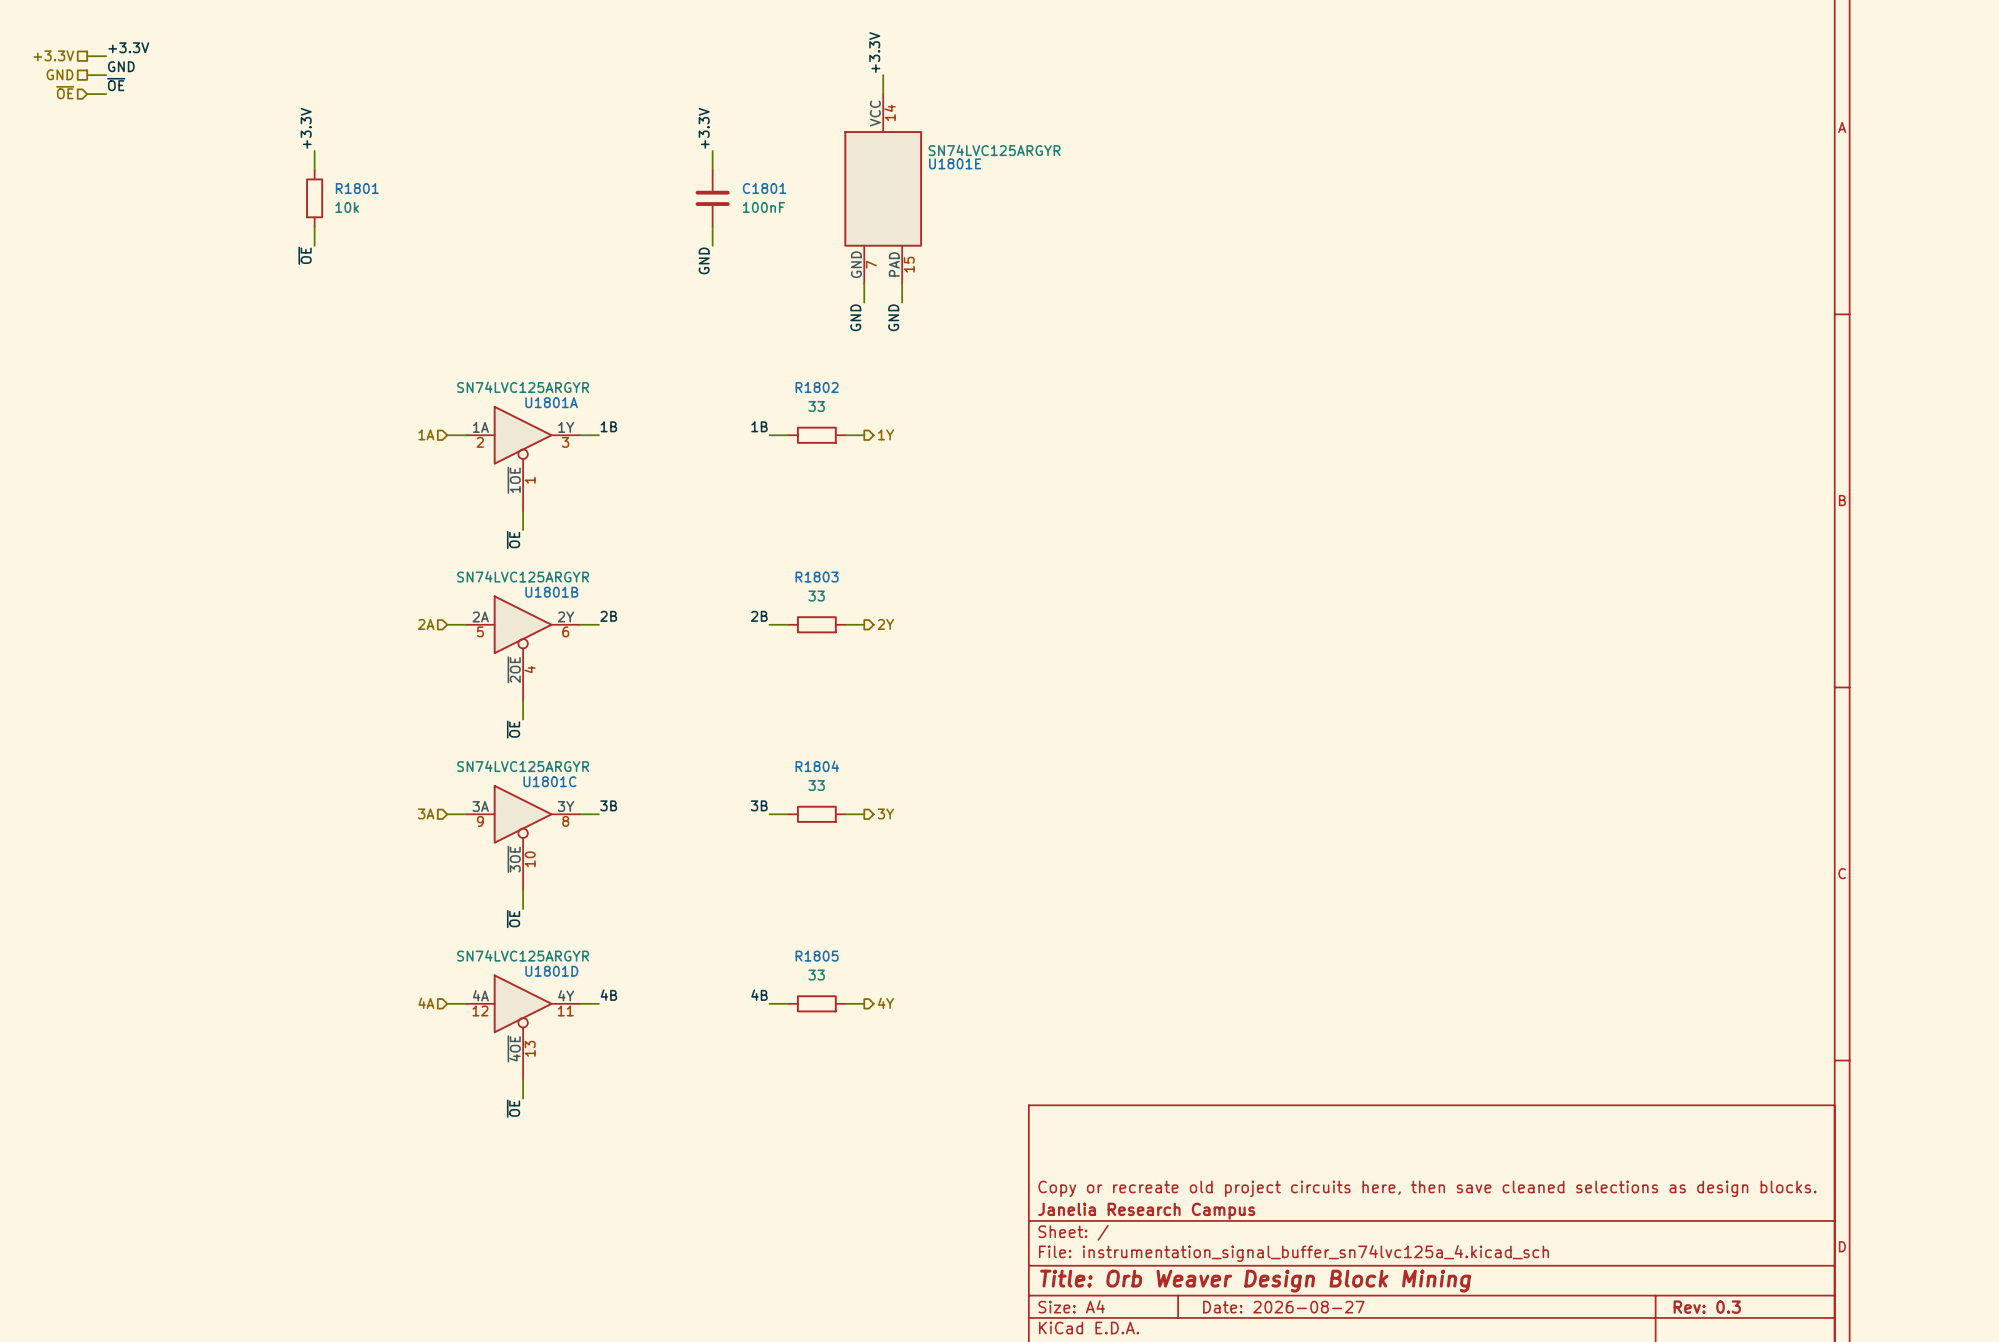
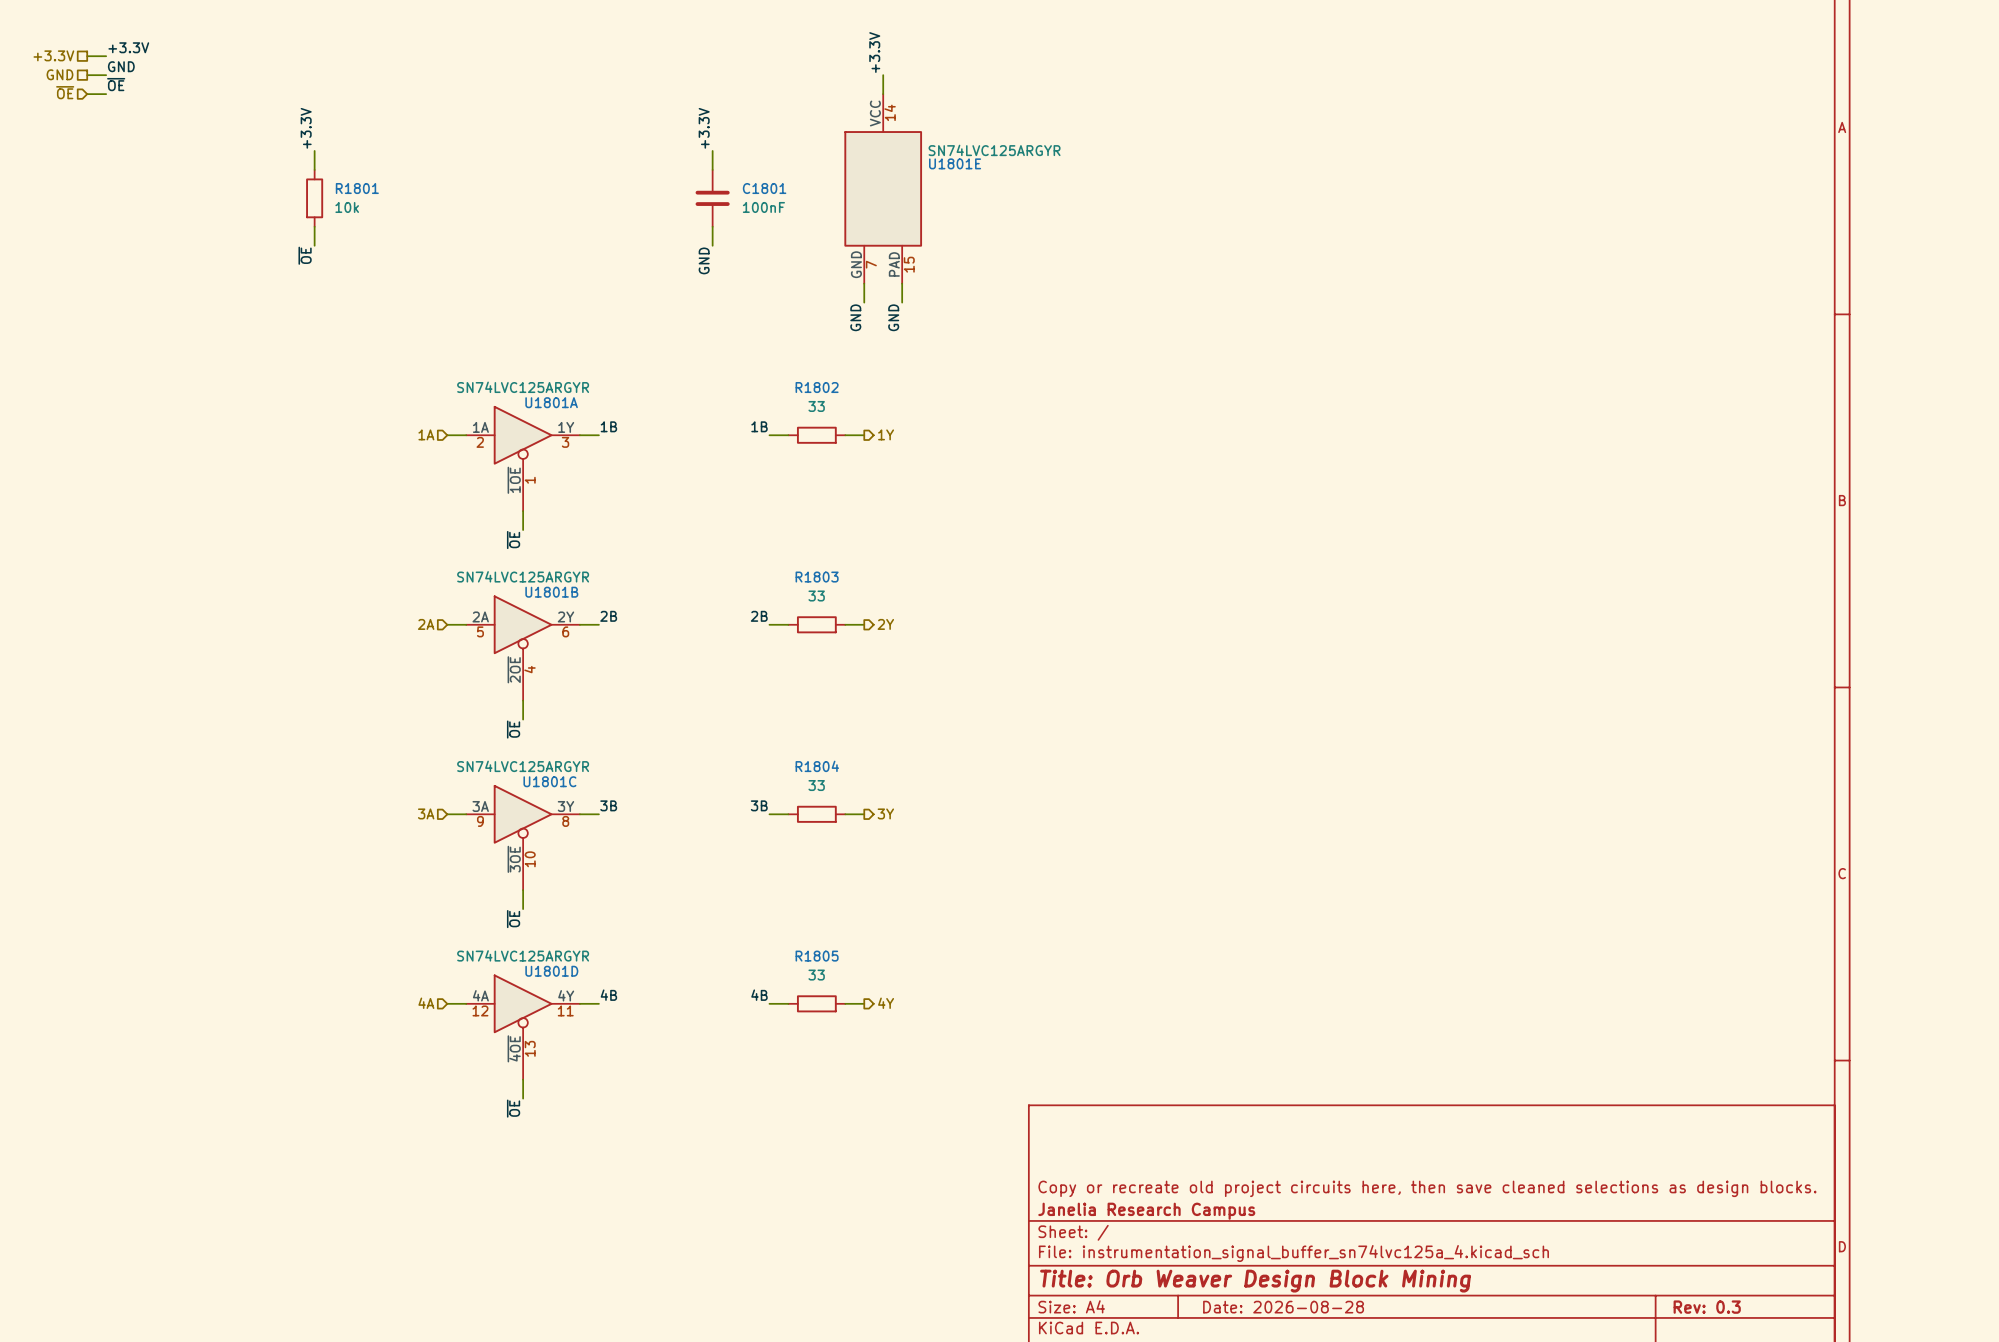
title block: Date: 2026-08-27 (1283, 1307) -> Date: 2026-08-28 (1283, 1307)

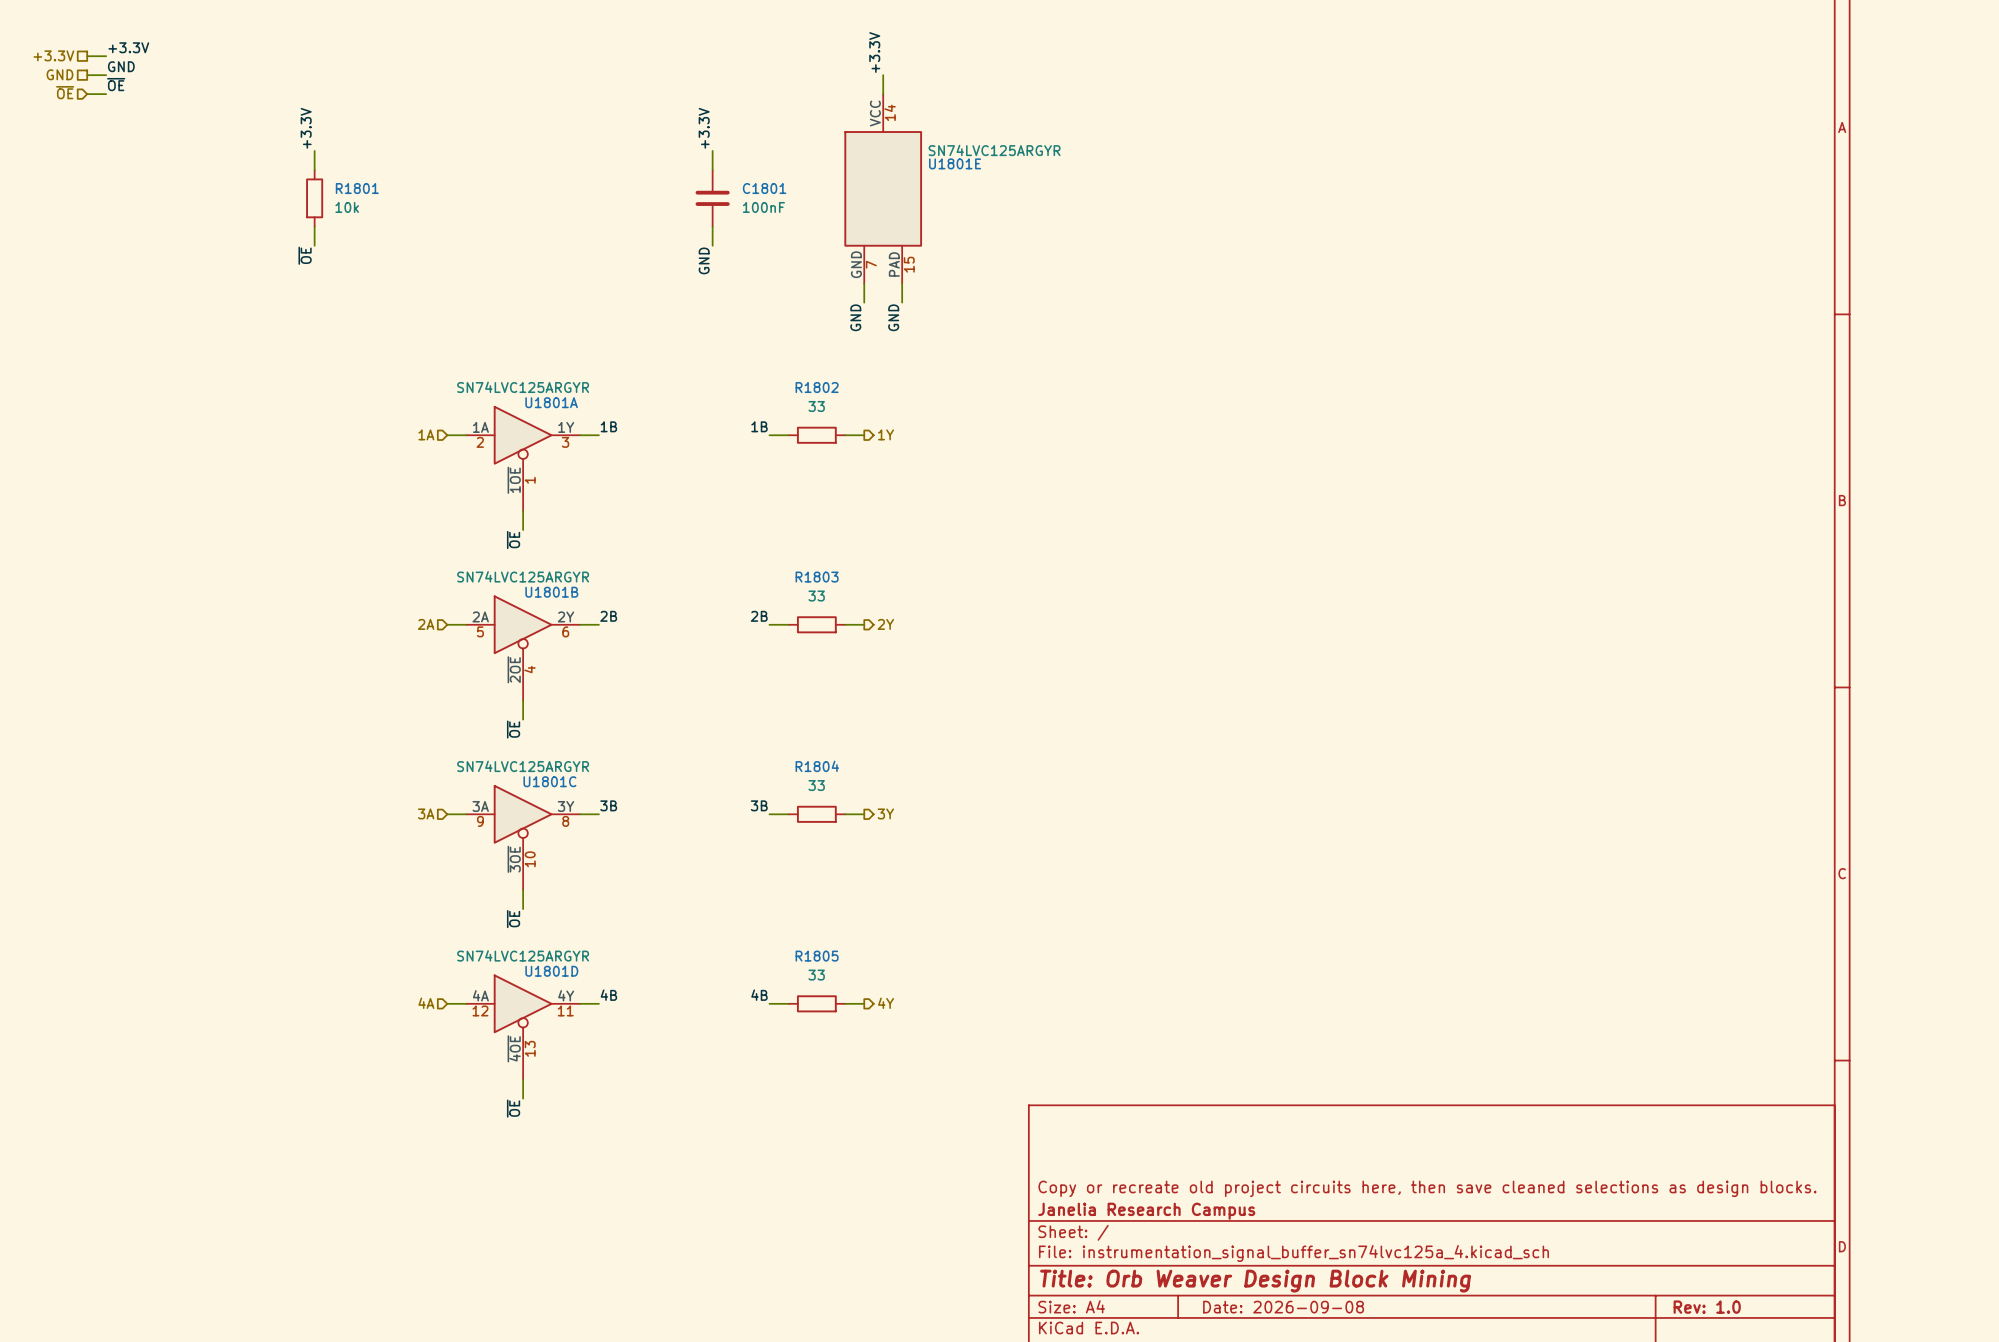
title block: Date: 2026-08-28 (1283, 1307) -> Date: 2026-09-08 (1283, 1307)
title block: Rev: 0.3 (1707, 1307) -> Rev: 1.0 (1707, 1307)

